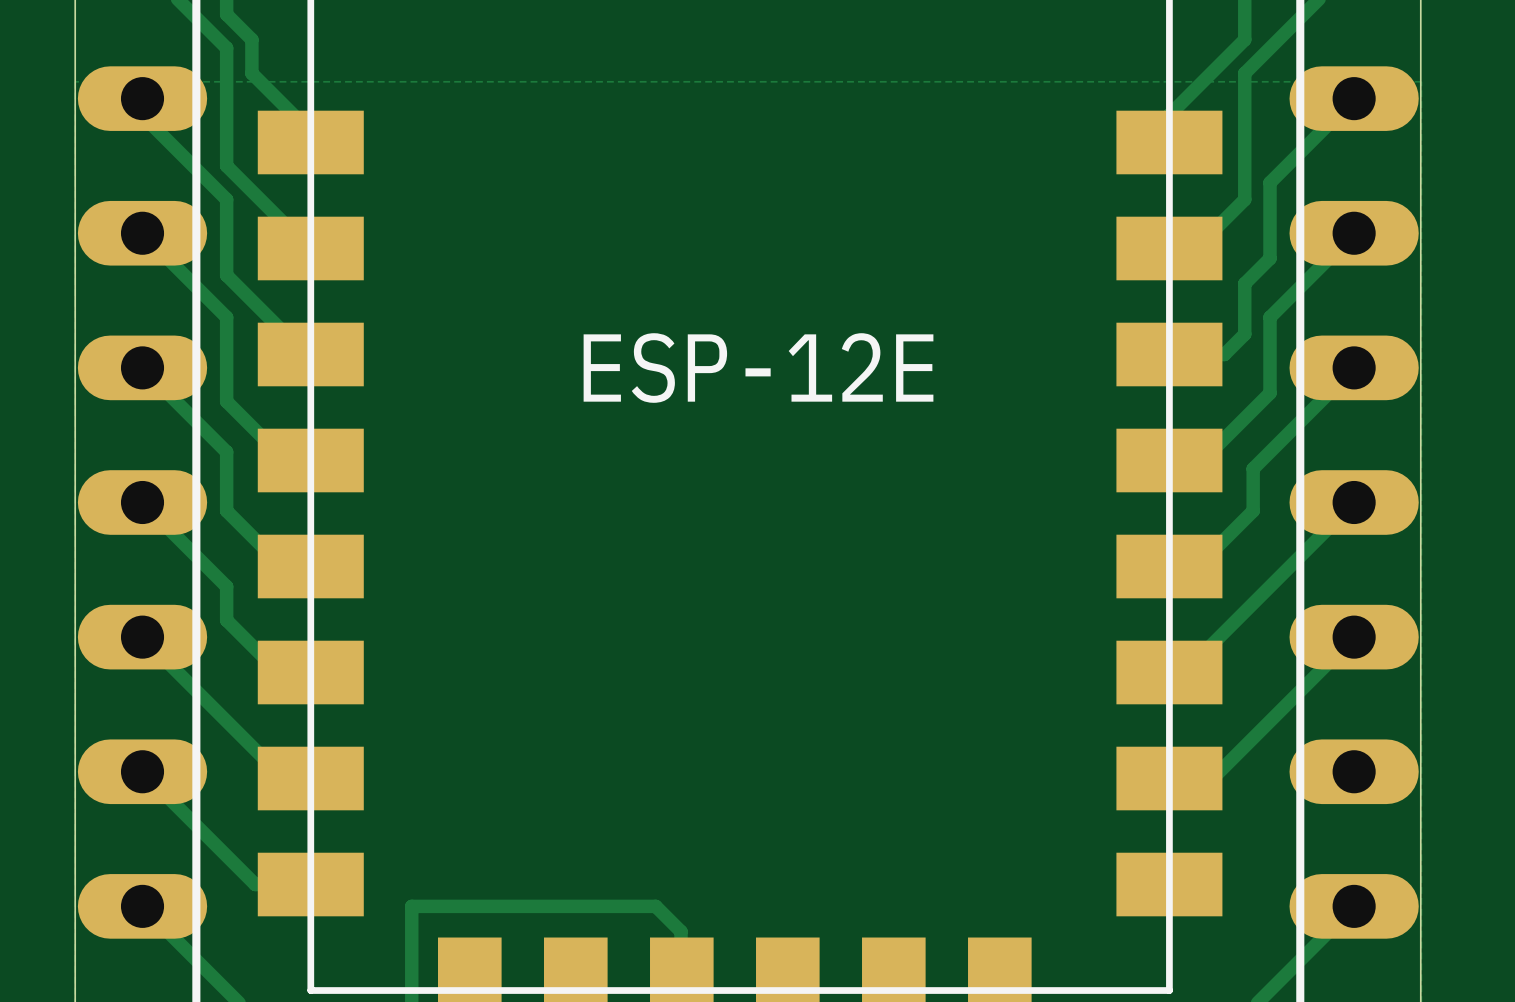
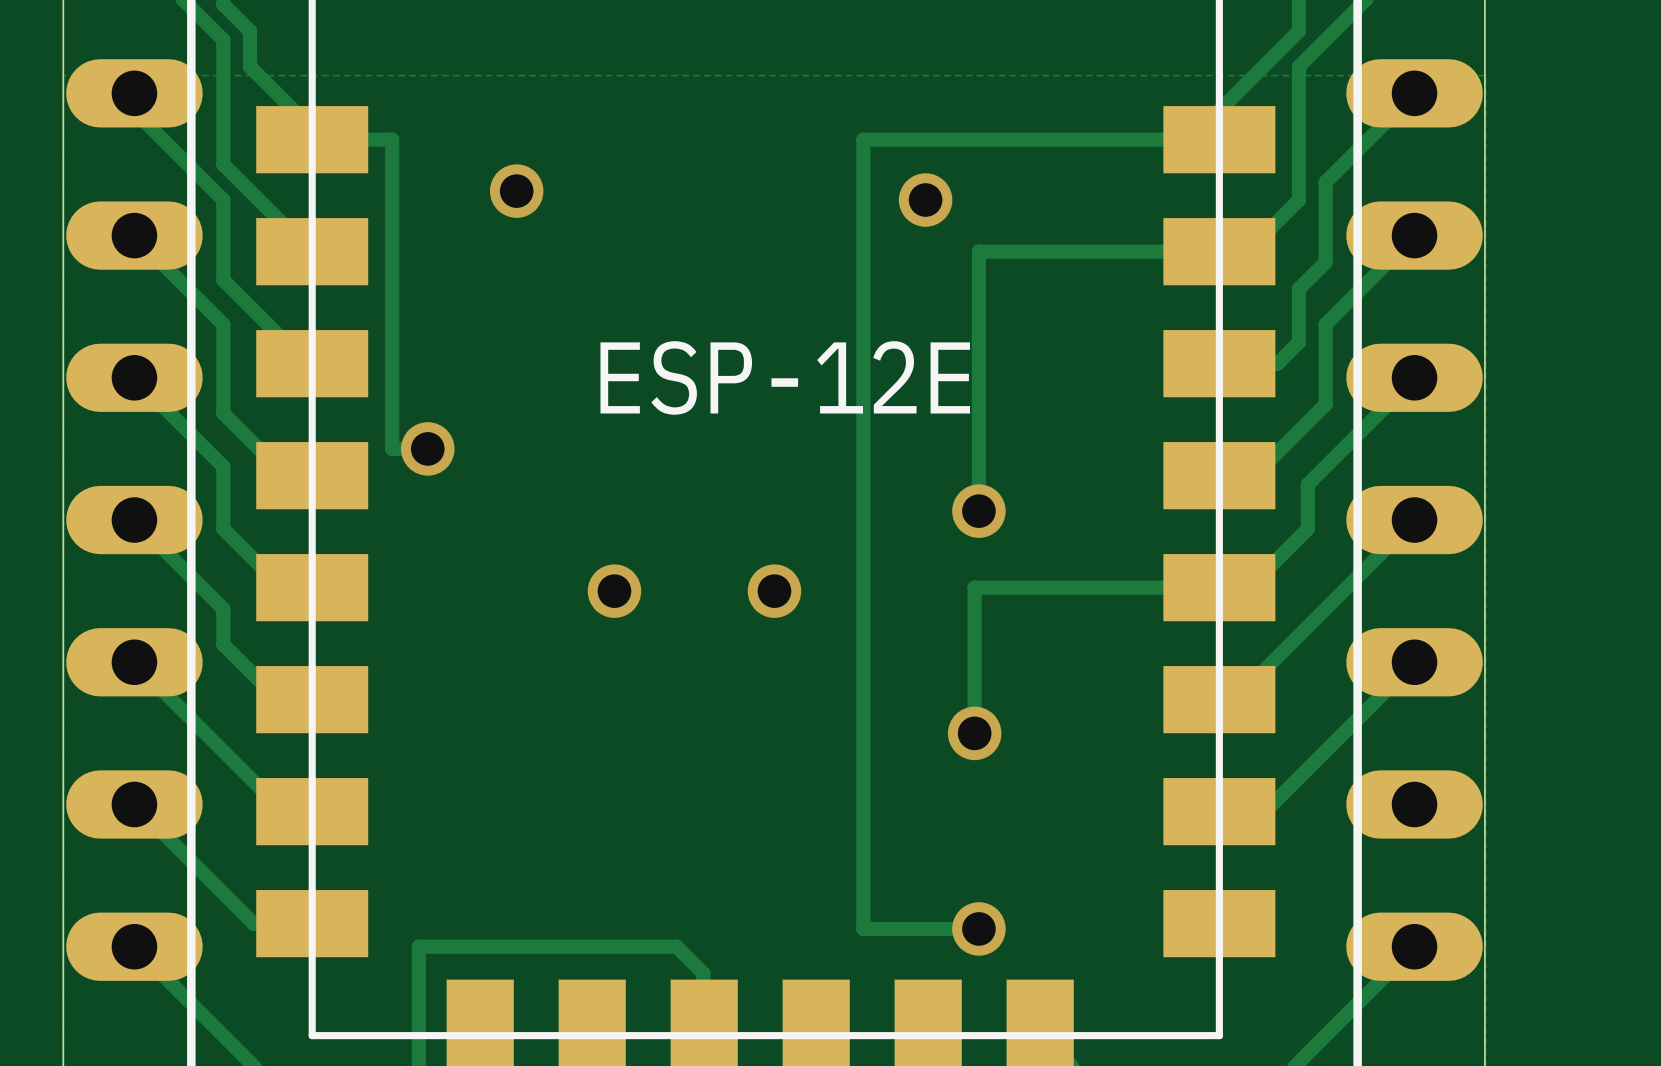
track: none -> (312, 139) (392, 139) (392, 448) (427, 448)
track: none -> (1219, 139) (863, 139) (863, 928) (978, 928)
via: none -> (516, 191)
via: none -> (925, 200)
track: none -> (1219, 251) (978, 251) (978, 511)
via: none -> (427, 448)
via: none -> (978, 511)
track: none -> (1219, 587) (974, 587) (974, 733)
via: none -> (614, 591)
via: none -> (774, 591)
via: none -> (974, 733)
via: none -> (978, 928)

